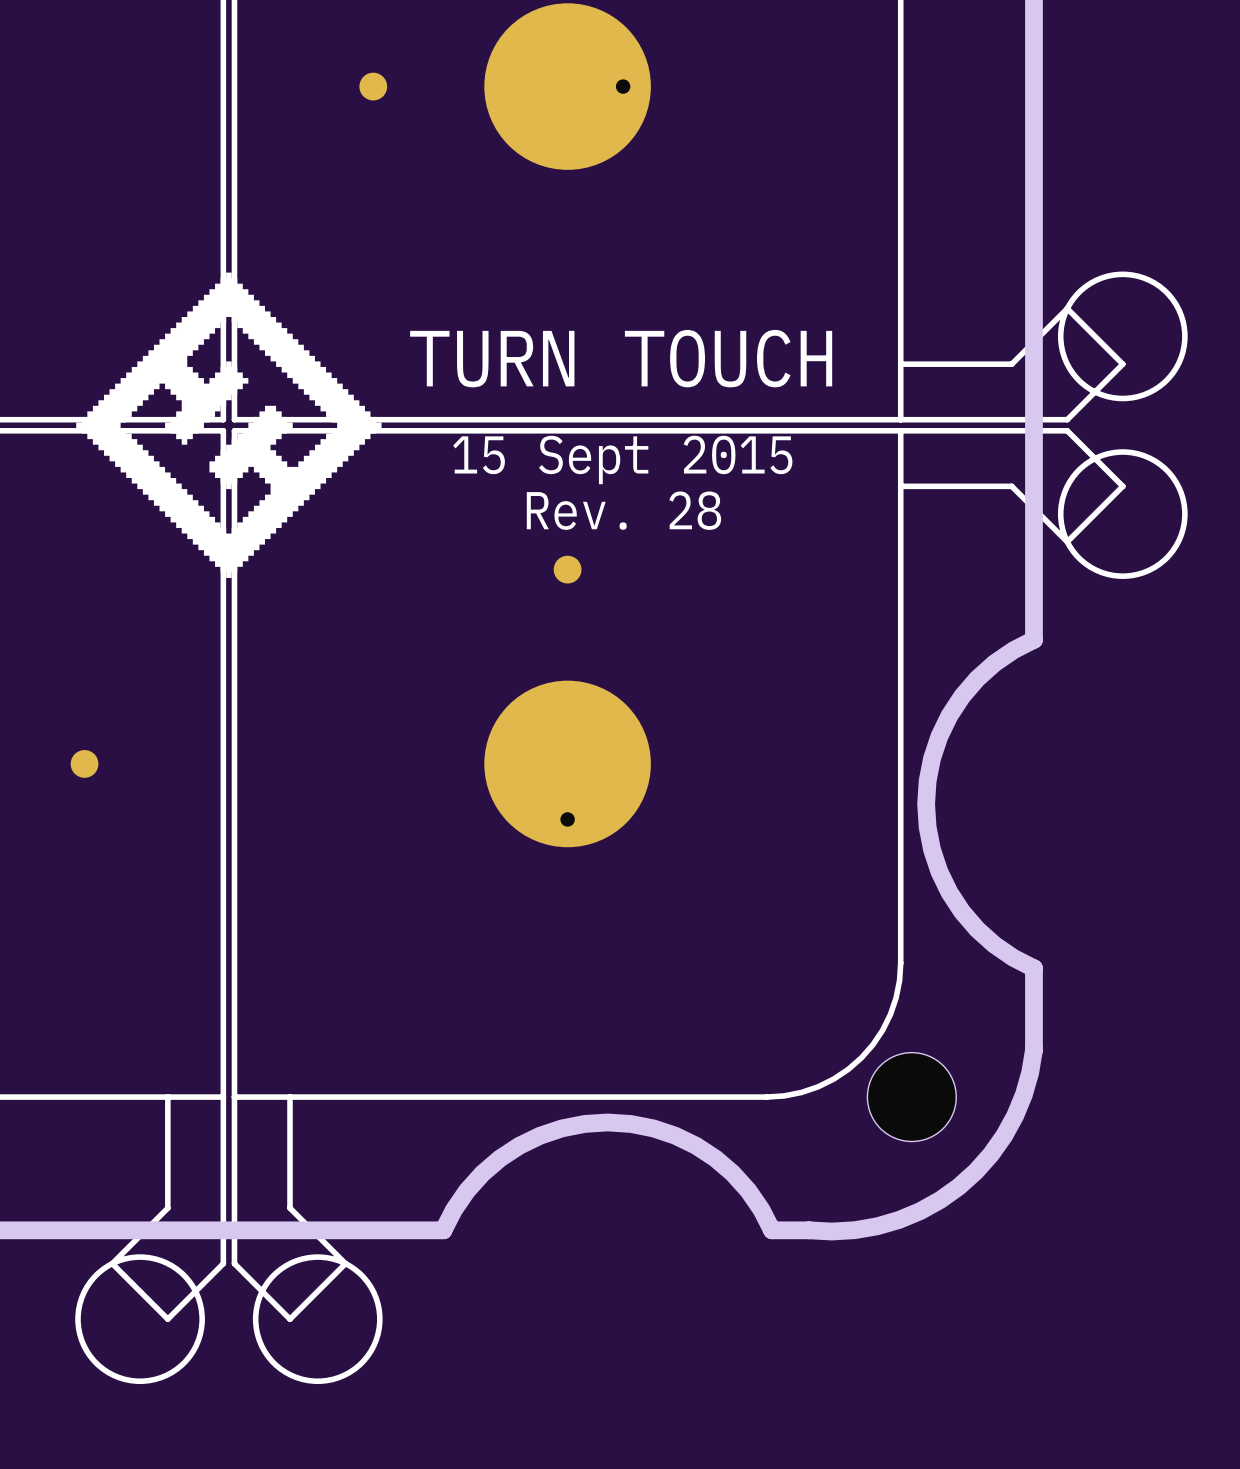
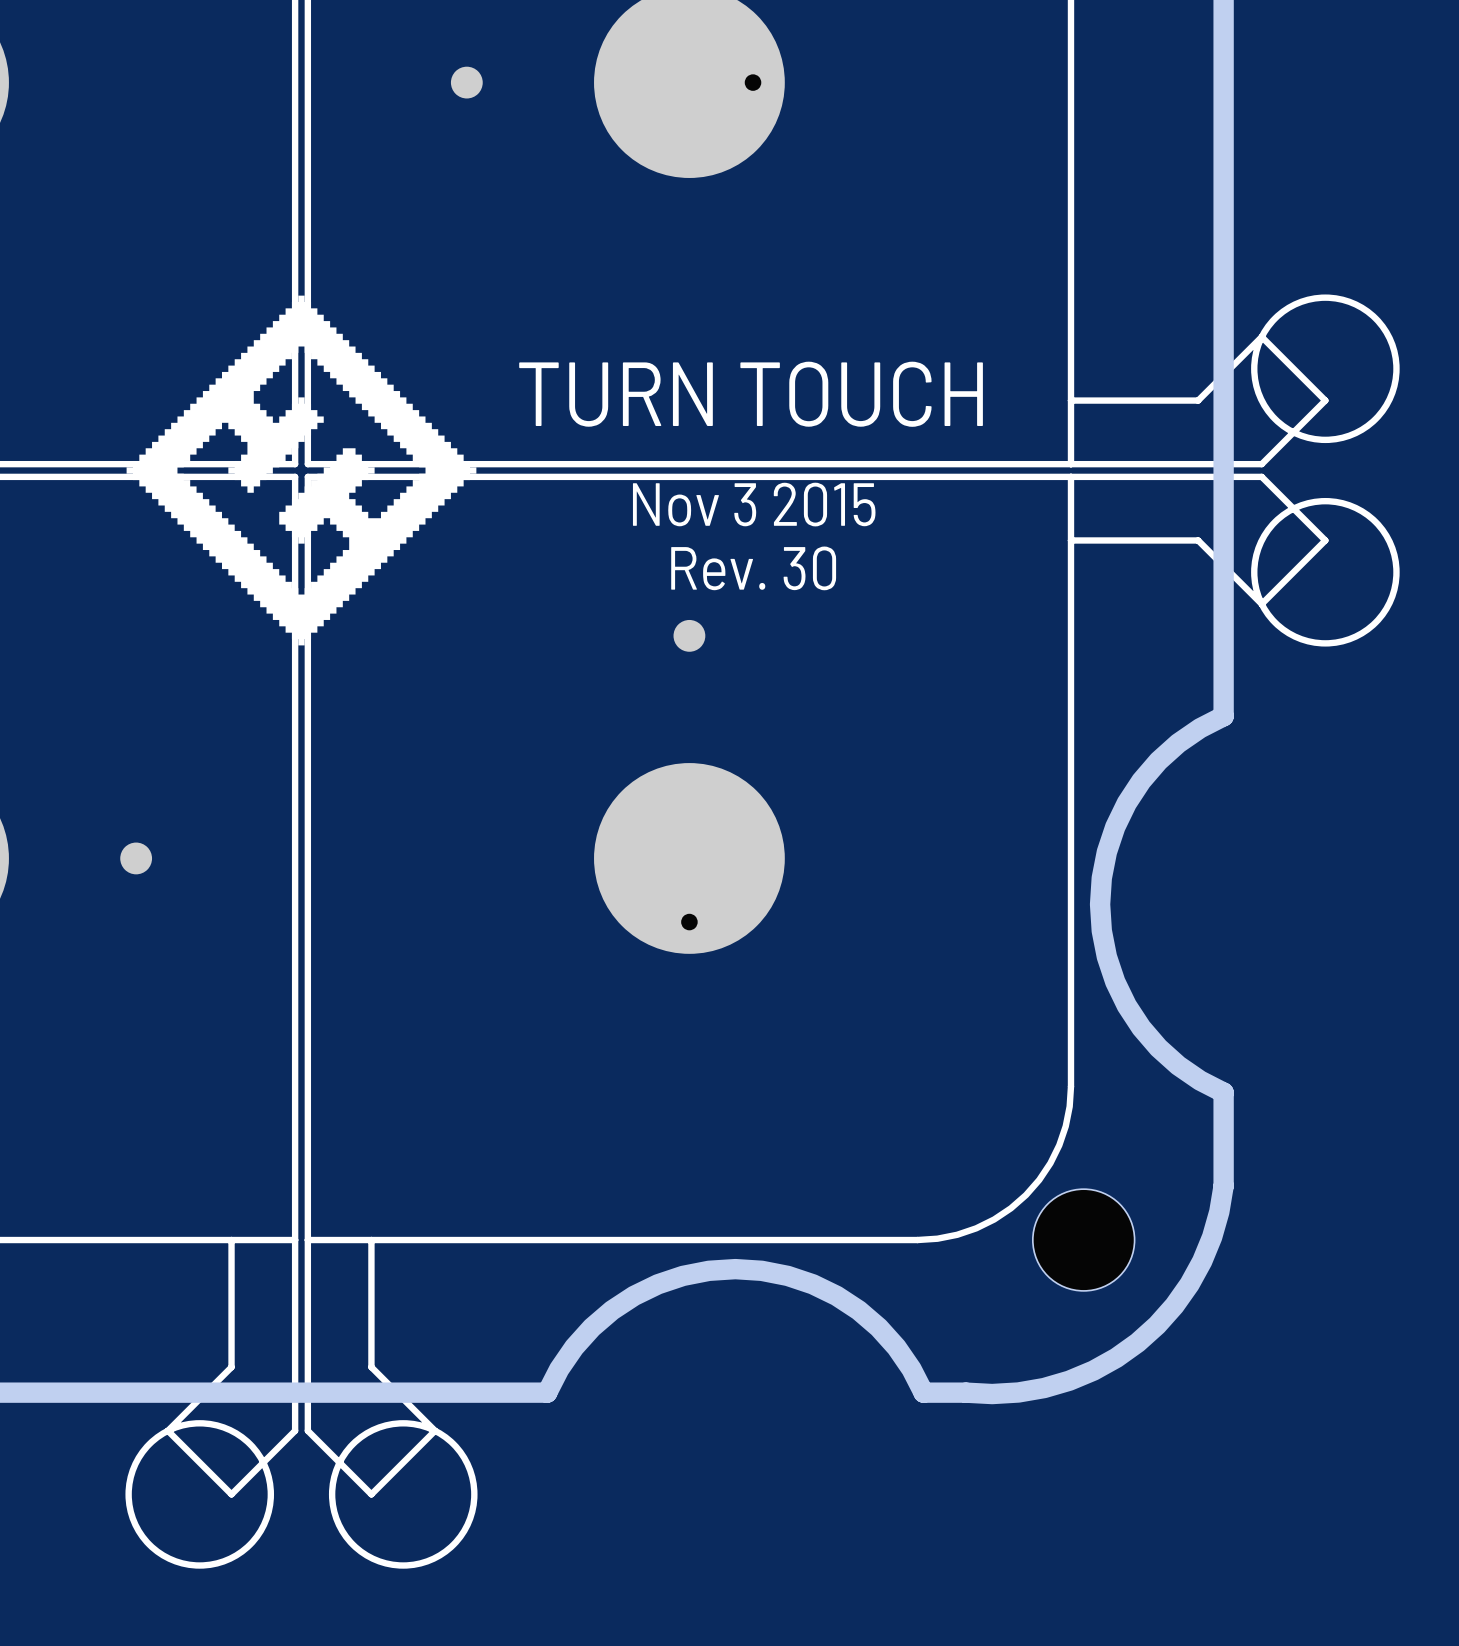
text: 15 Sept 2015 (622, 459) -> Nov 3 2015 (754, 504)
text: Rev. 28 (623, 510) -> Rev. 30 (753, 568)

